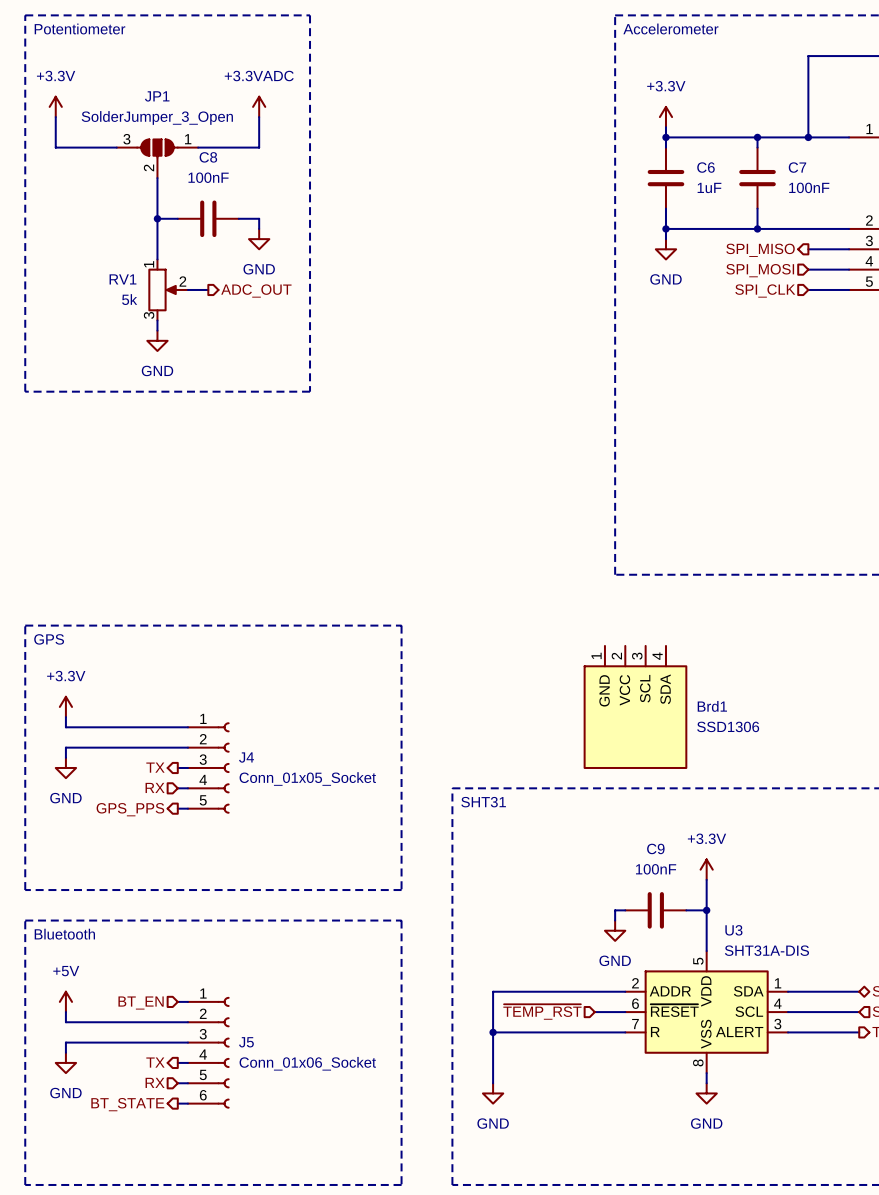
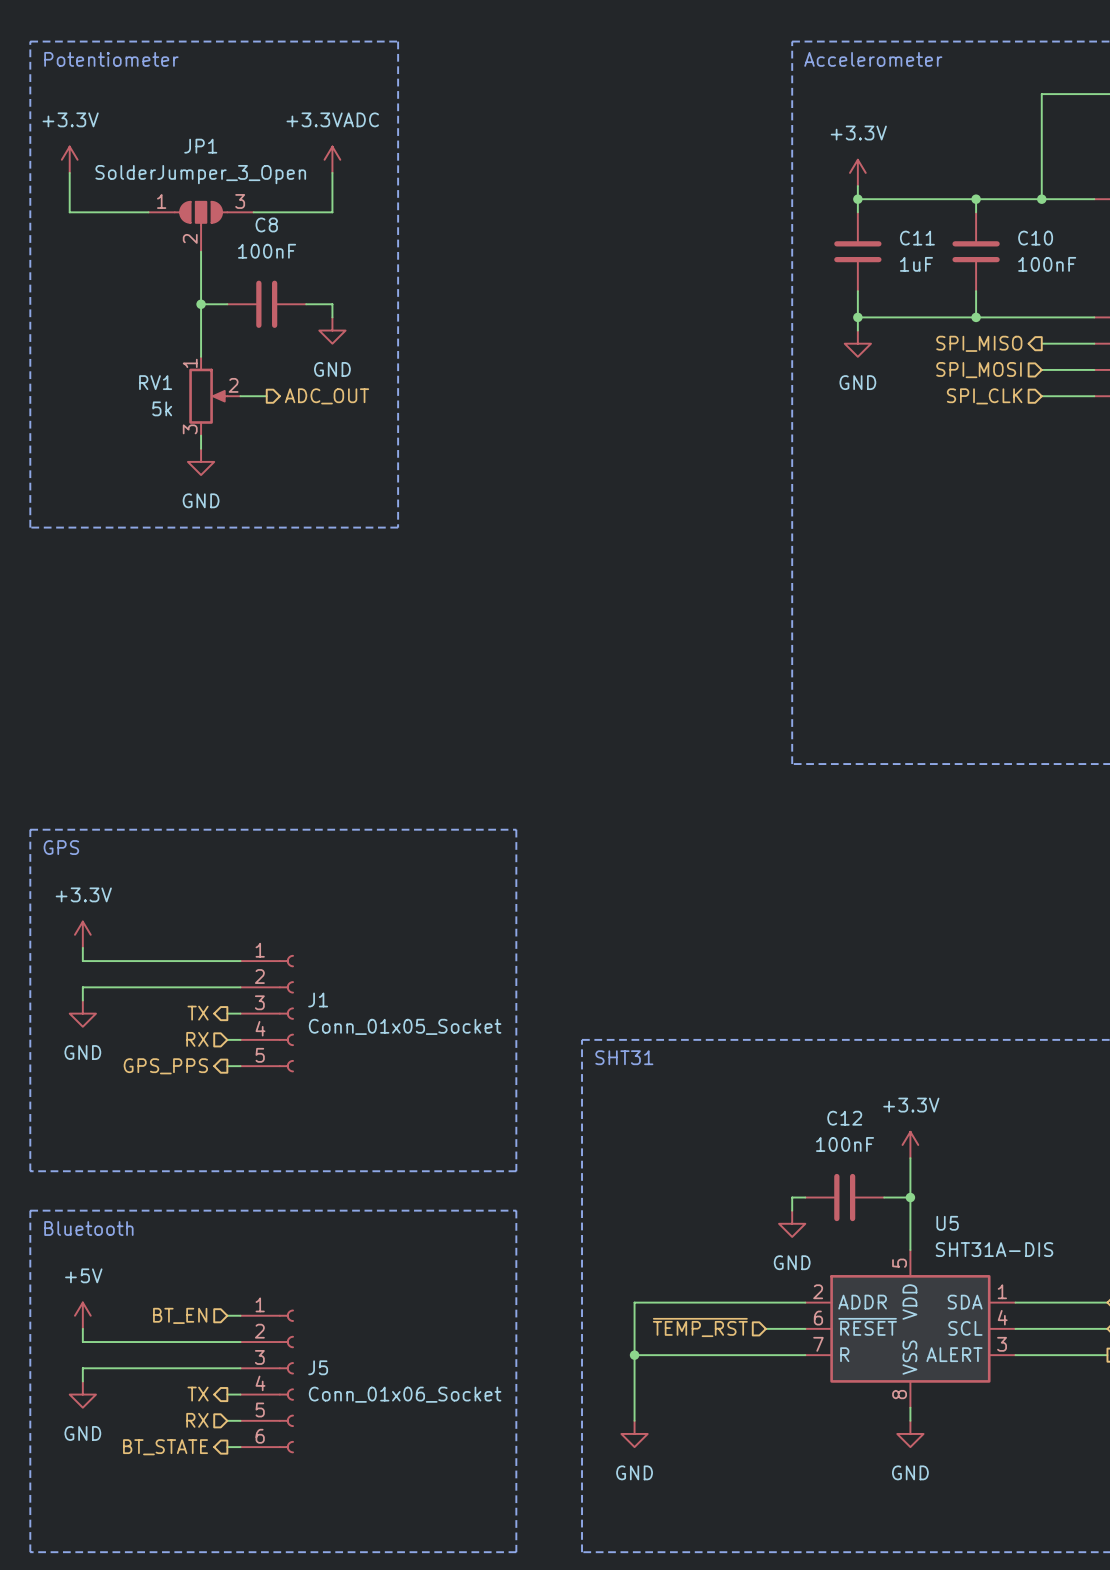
JP1 flip: as is (157, 148) -> left-right (201, 213)
C6 name: C6 (705, 167) -> C11 (917, 238)
C7 name: C7 (797, 167) -> C10 (1035, 238)
Brd1: SSD1306 (635, 706) -> none
J4 name: J4 (246, 757) -> J1 (318, 999)
C9 name: C9 (655, 848) -> C12 (844, 1118)
U3 name: U3 (733, 930) -> U5 (947, 1223)

